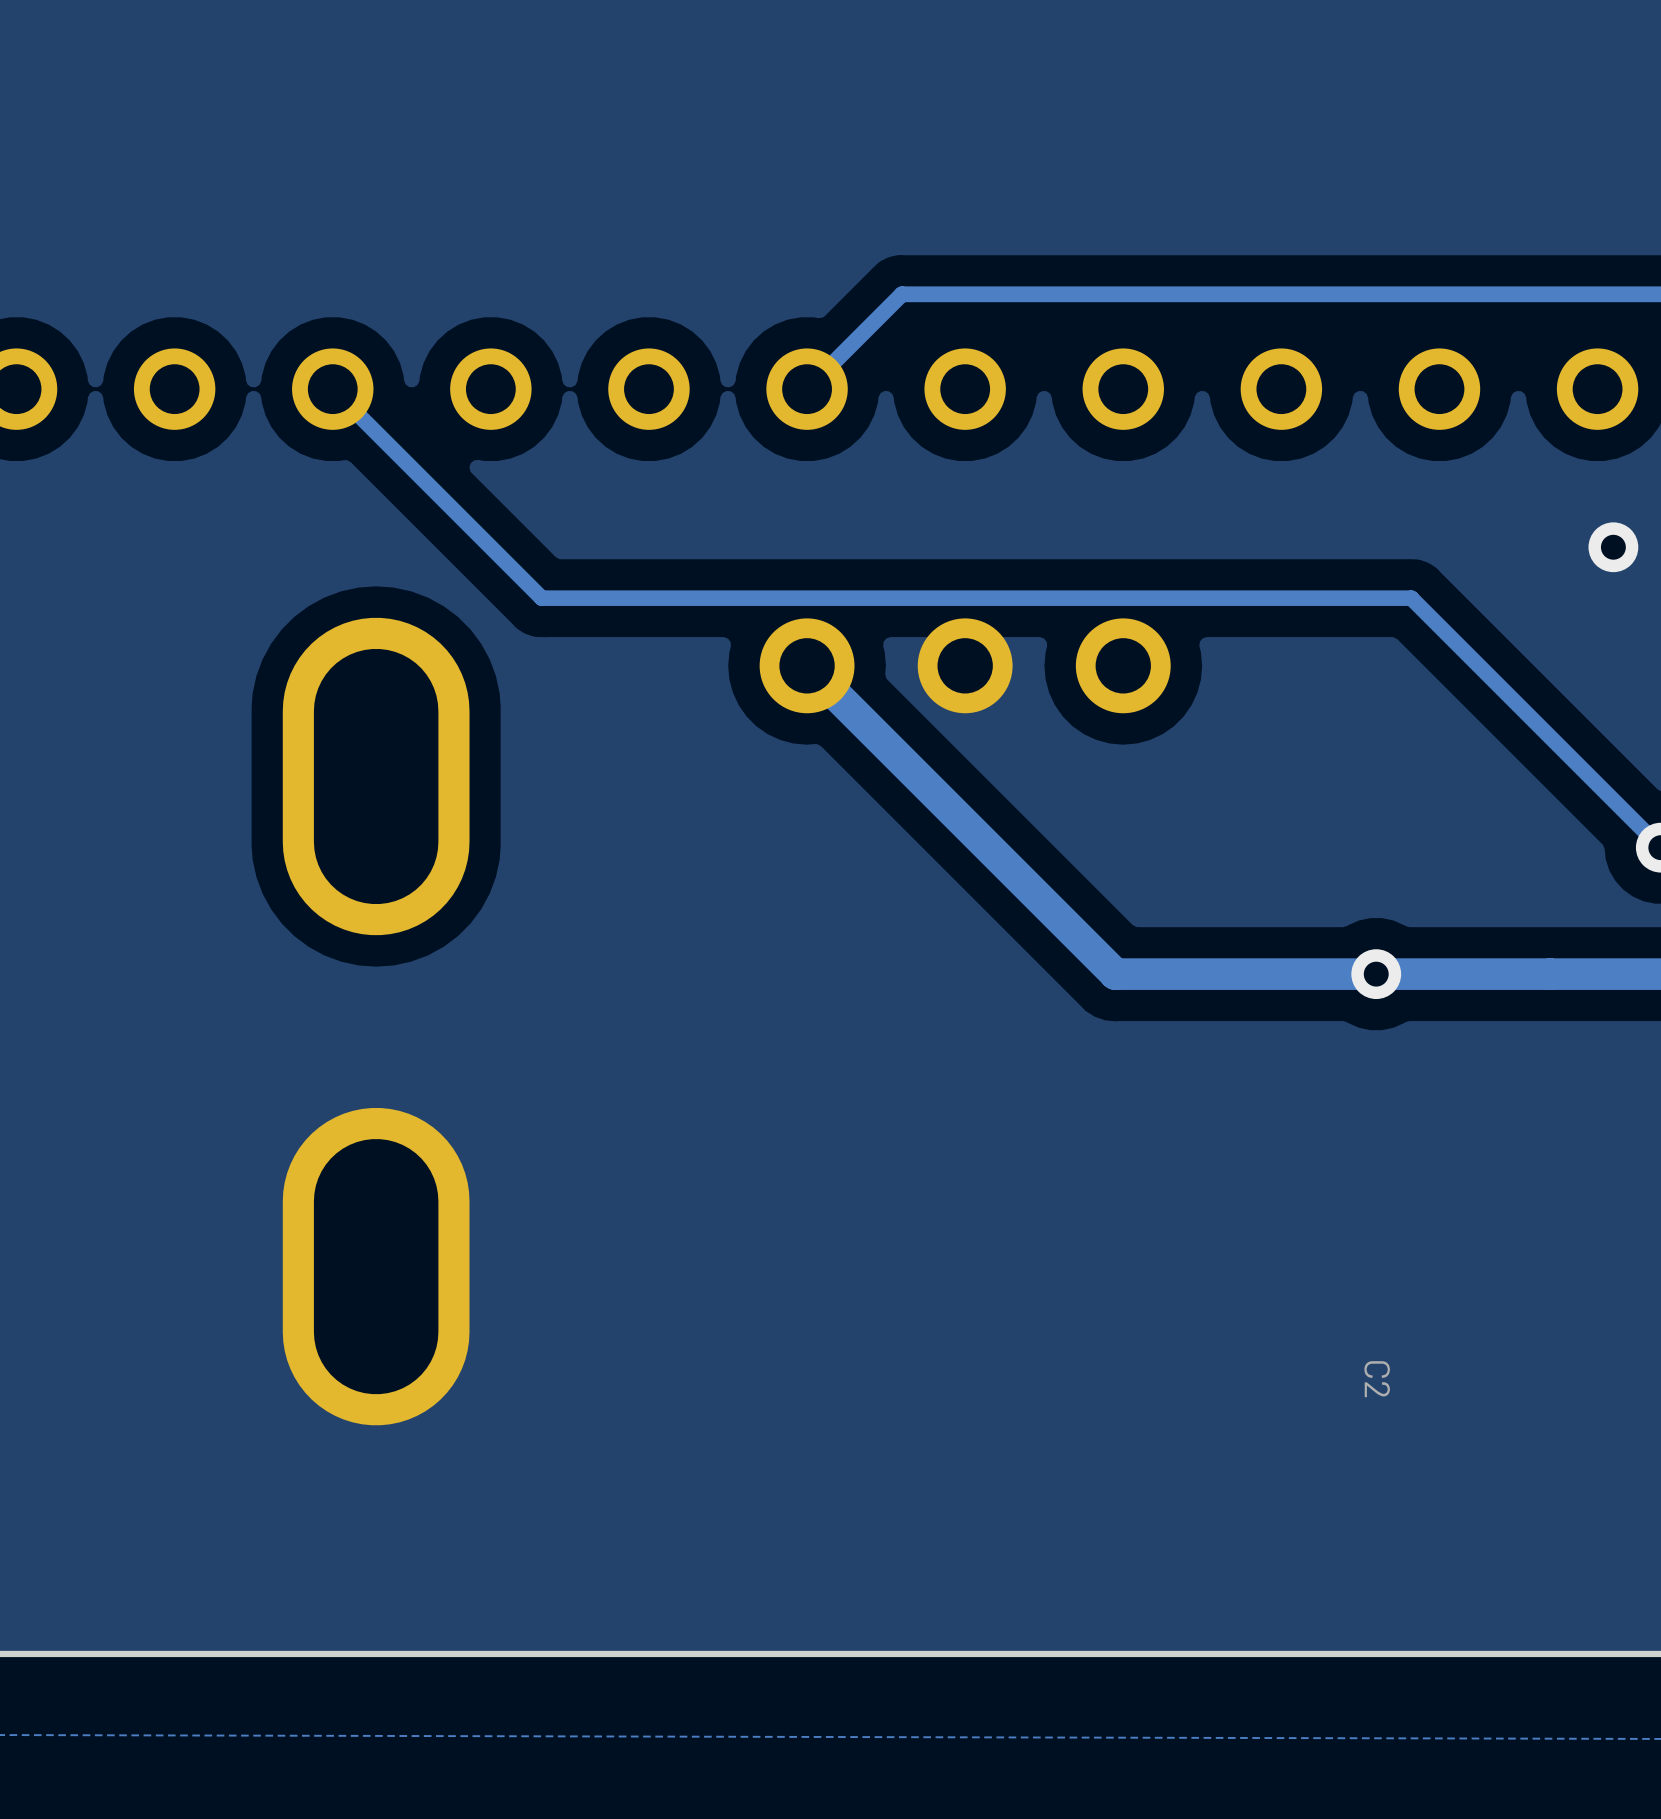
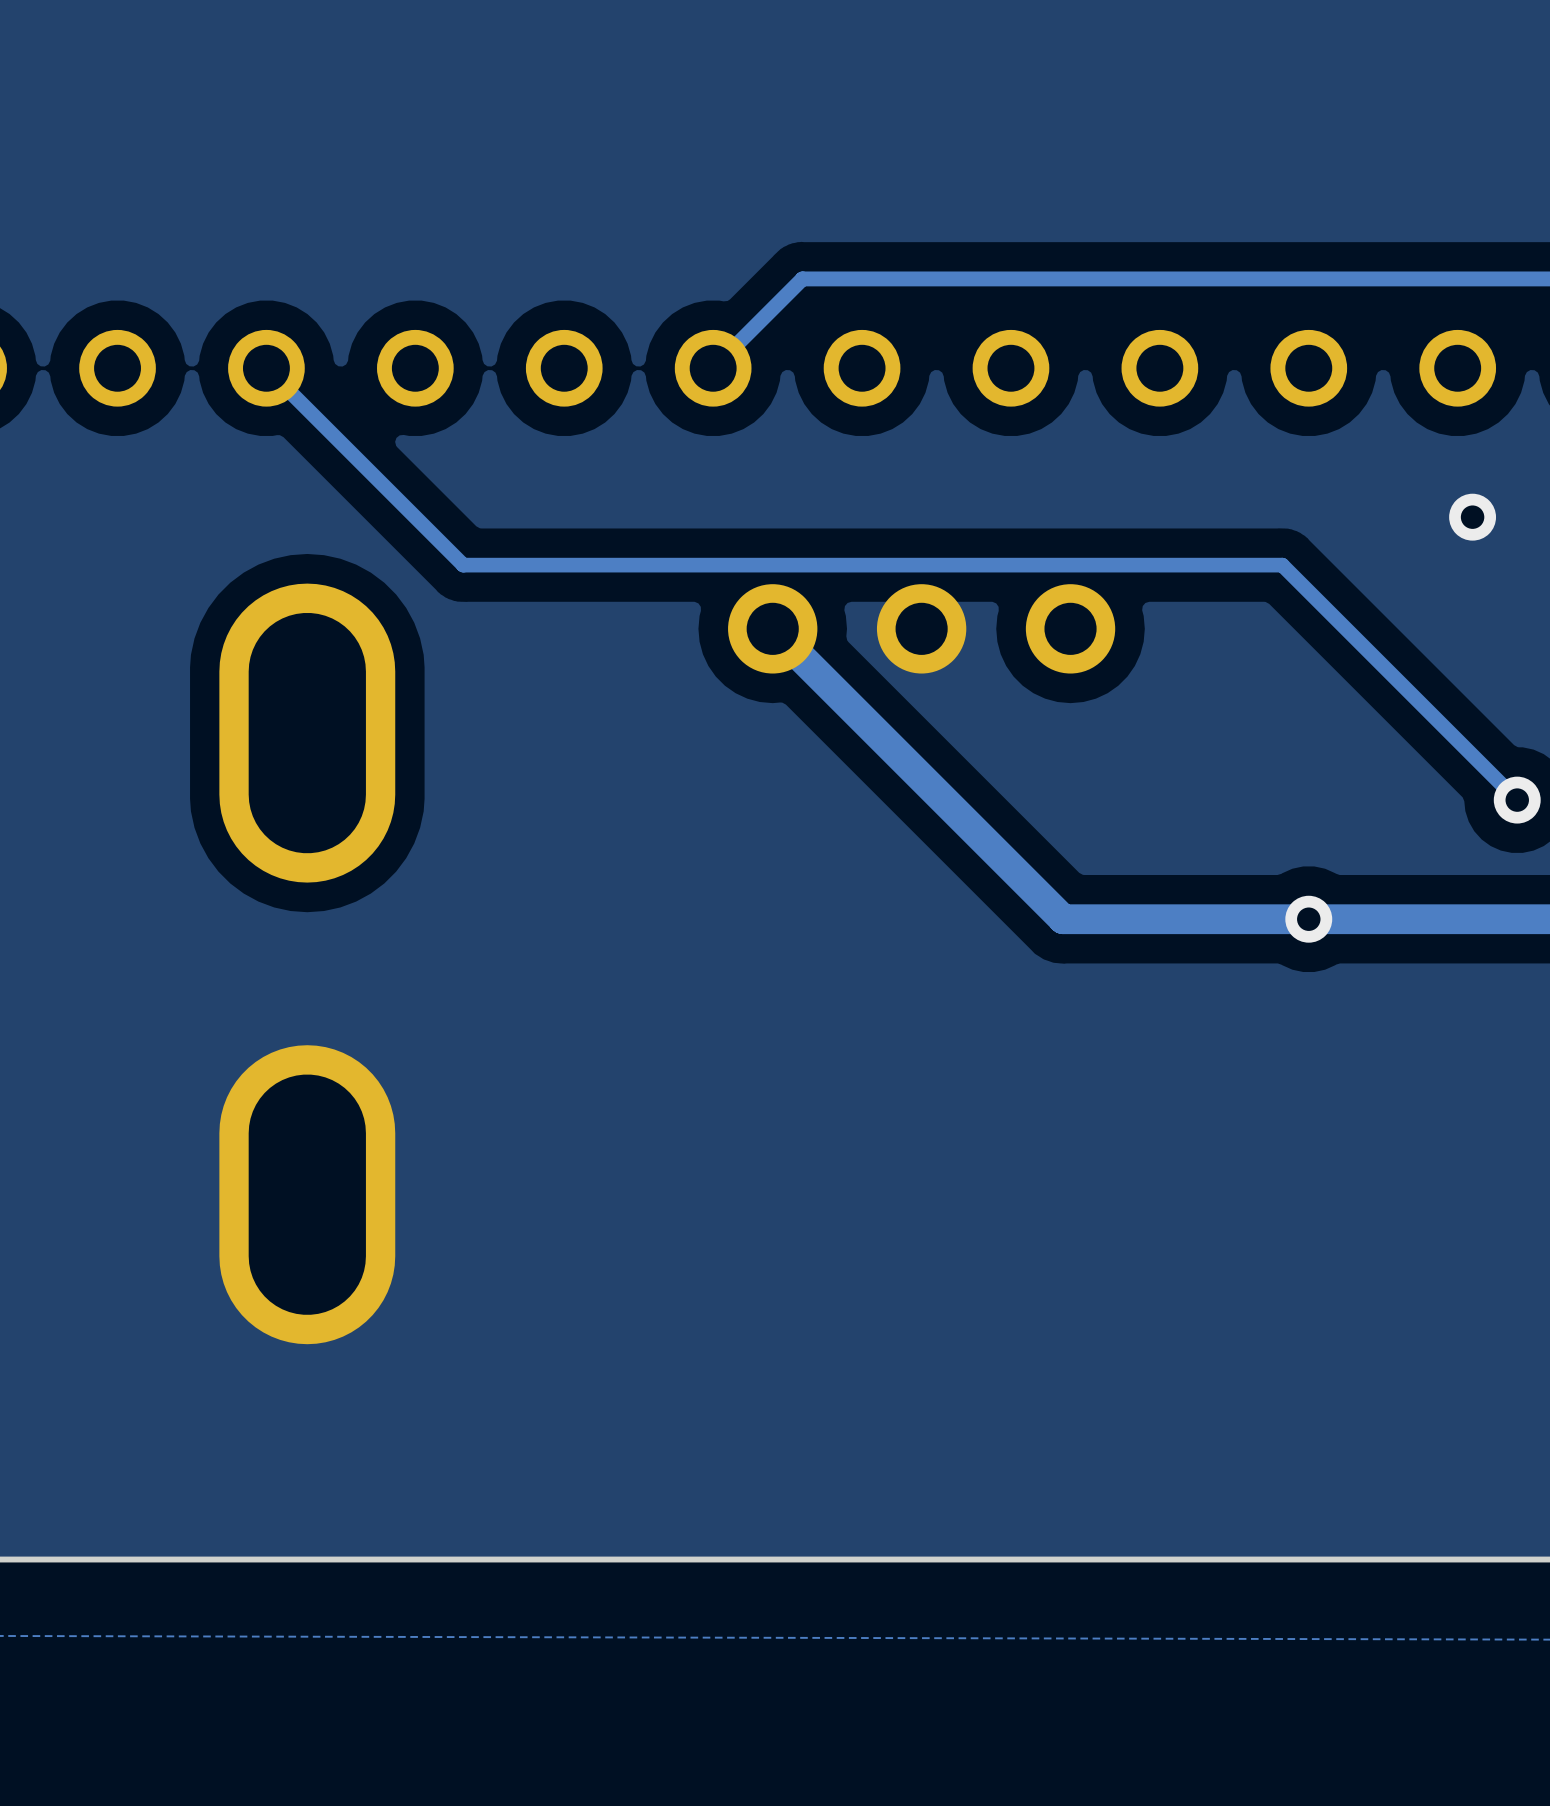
track: (807, 665) (1115, 974) (1178, 974) -> (772, 628) (1063, 919)
part position: (965, 665) -> (921, 628)
via position: (1376, 974) -> (1308, 919)
C2: (1377, 1379) -> none

